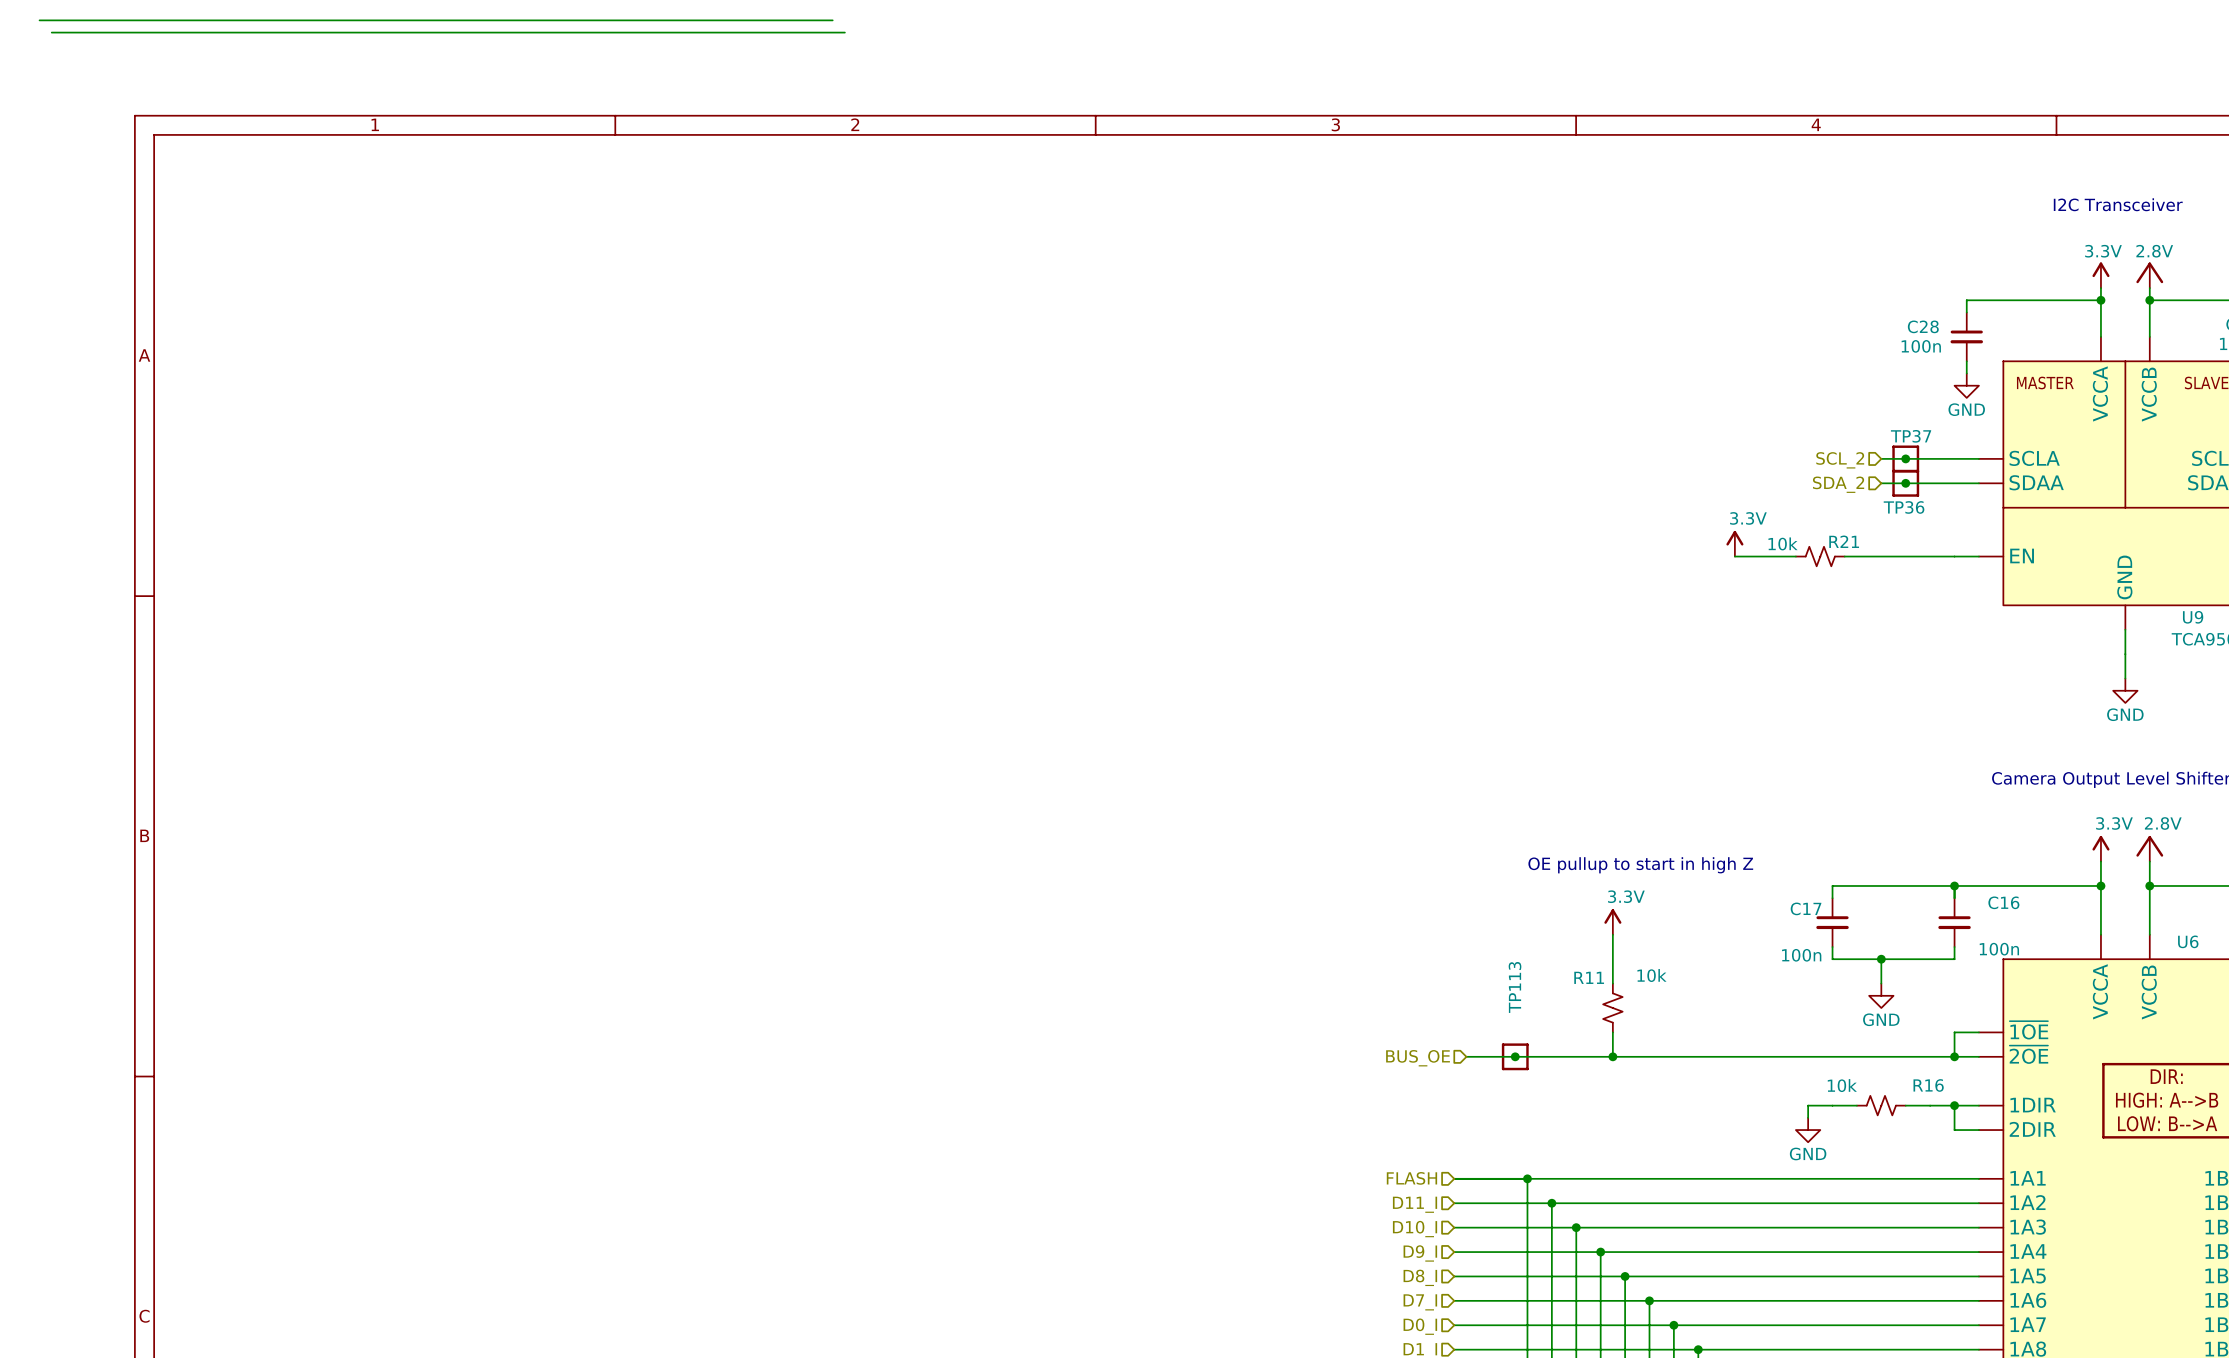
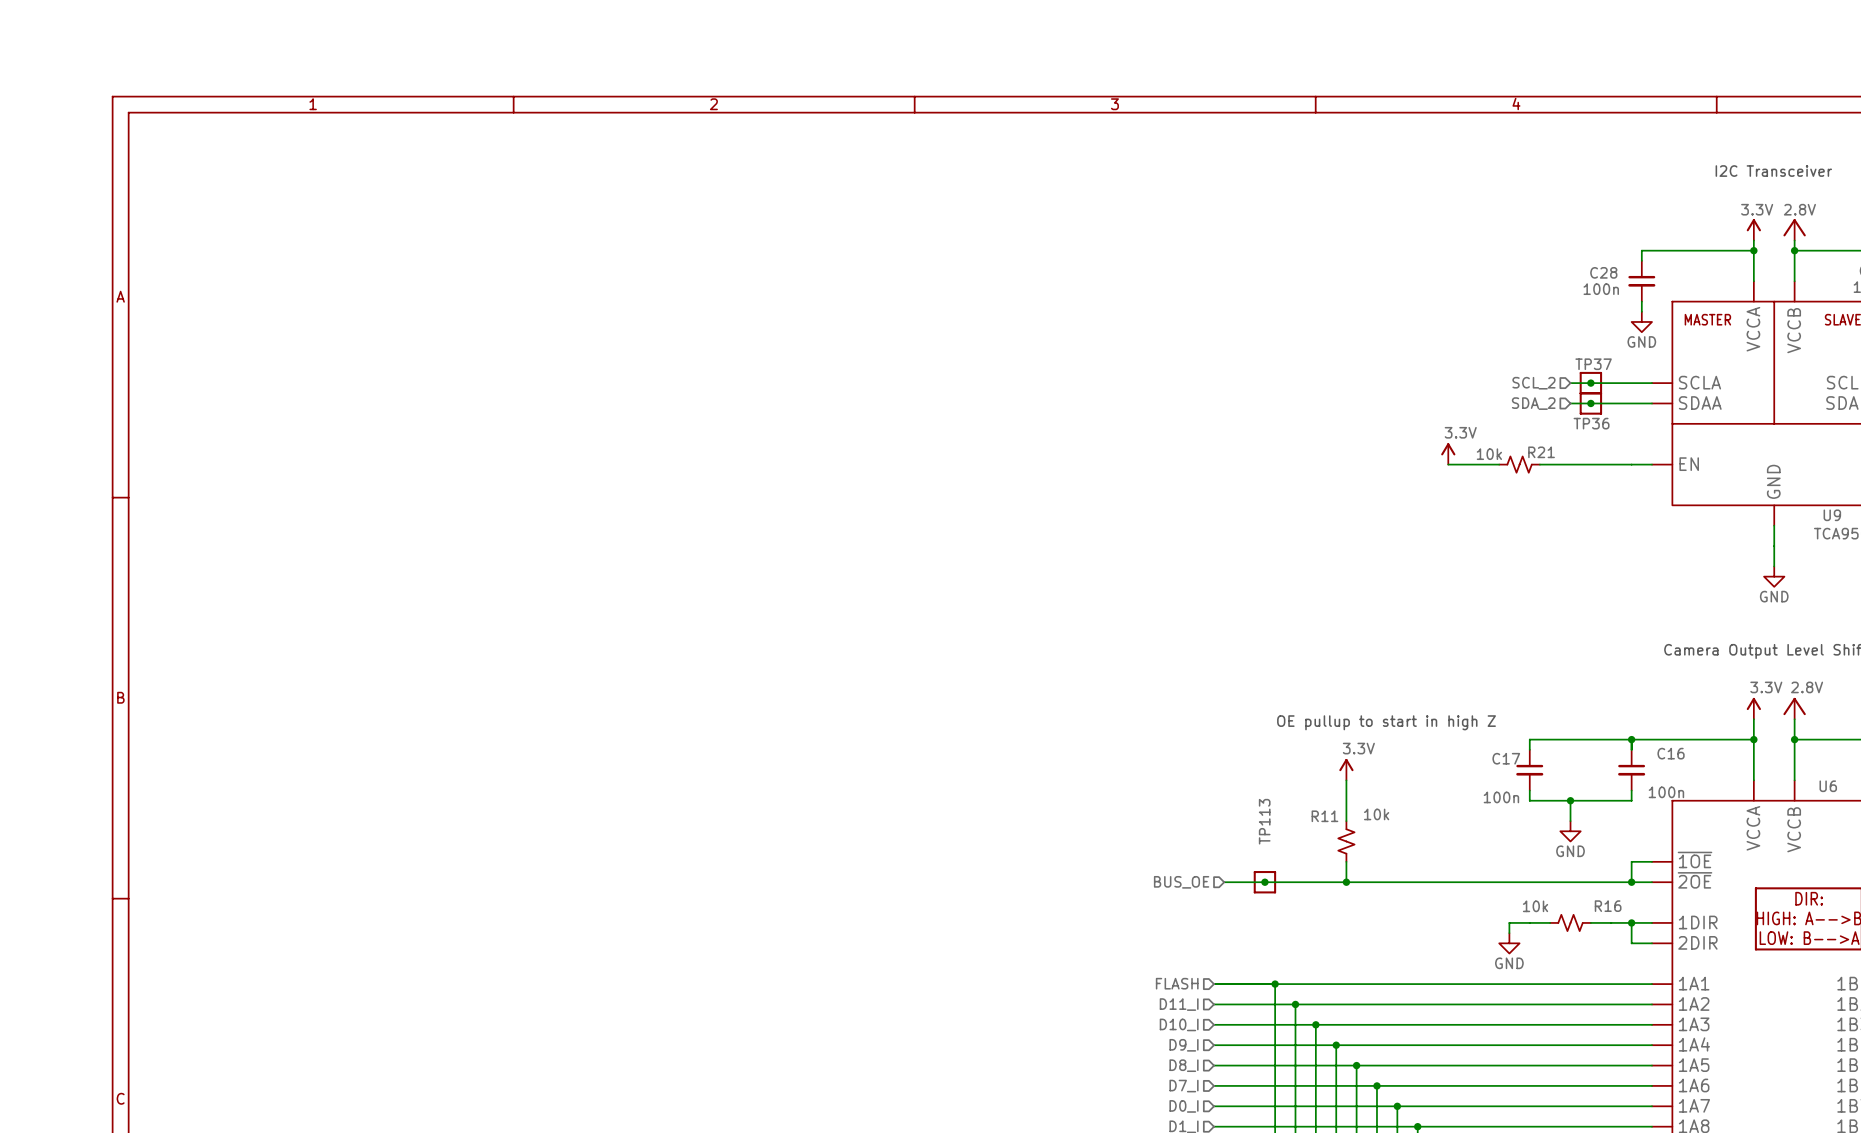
wire: (39, 20) (832, 20) -> none
wire: (51, 32) (844, 32) -> none

